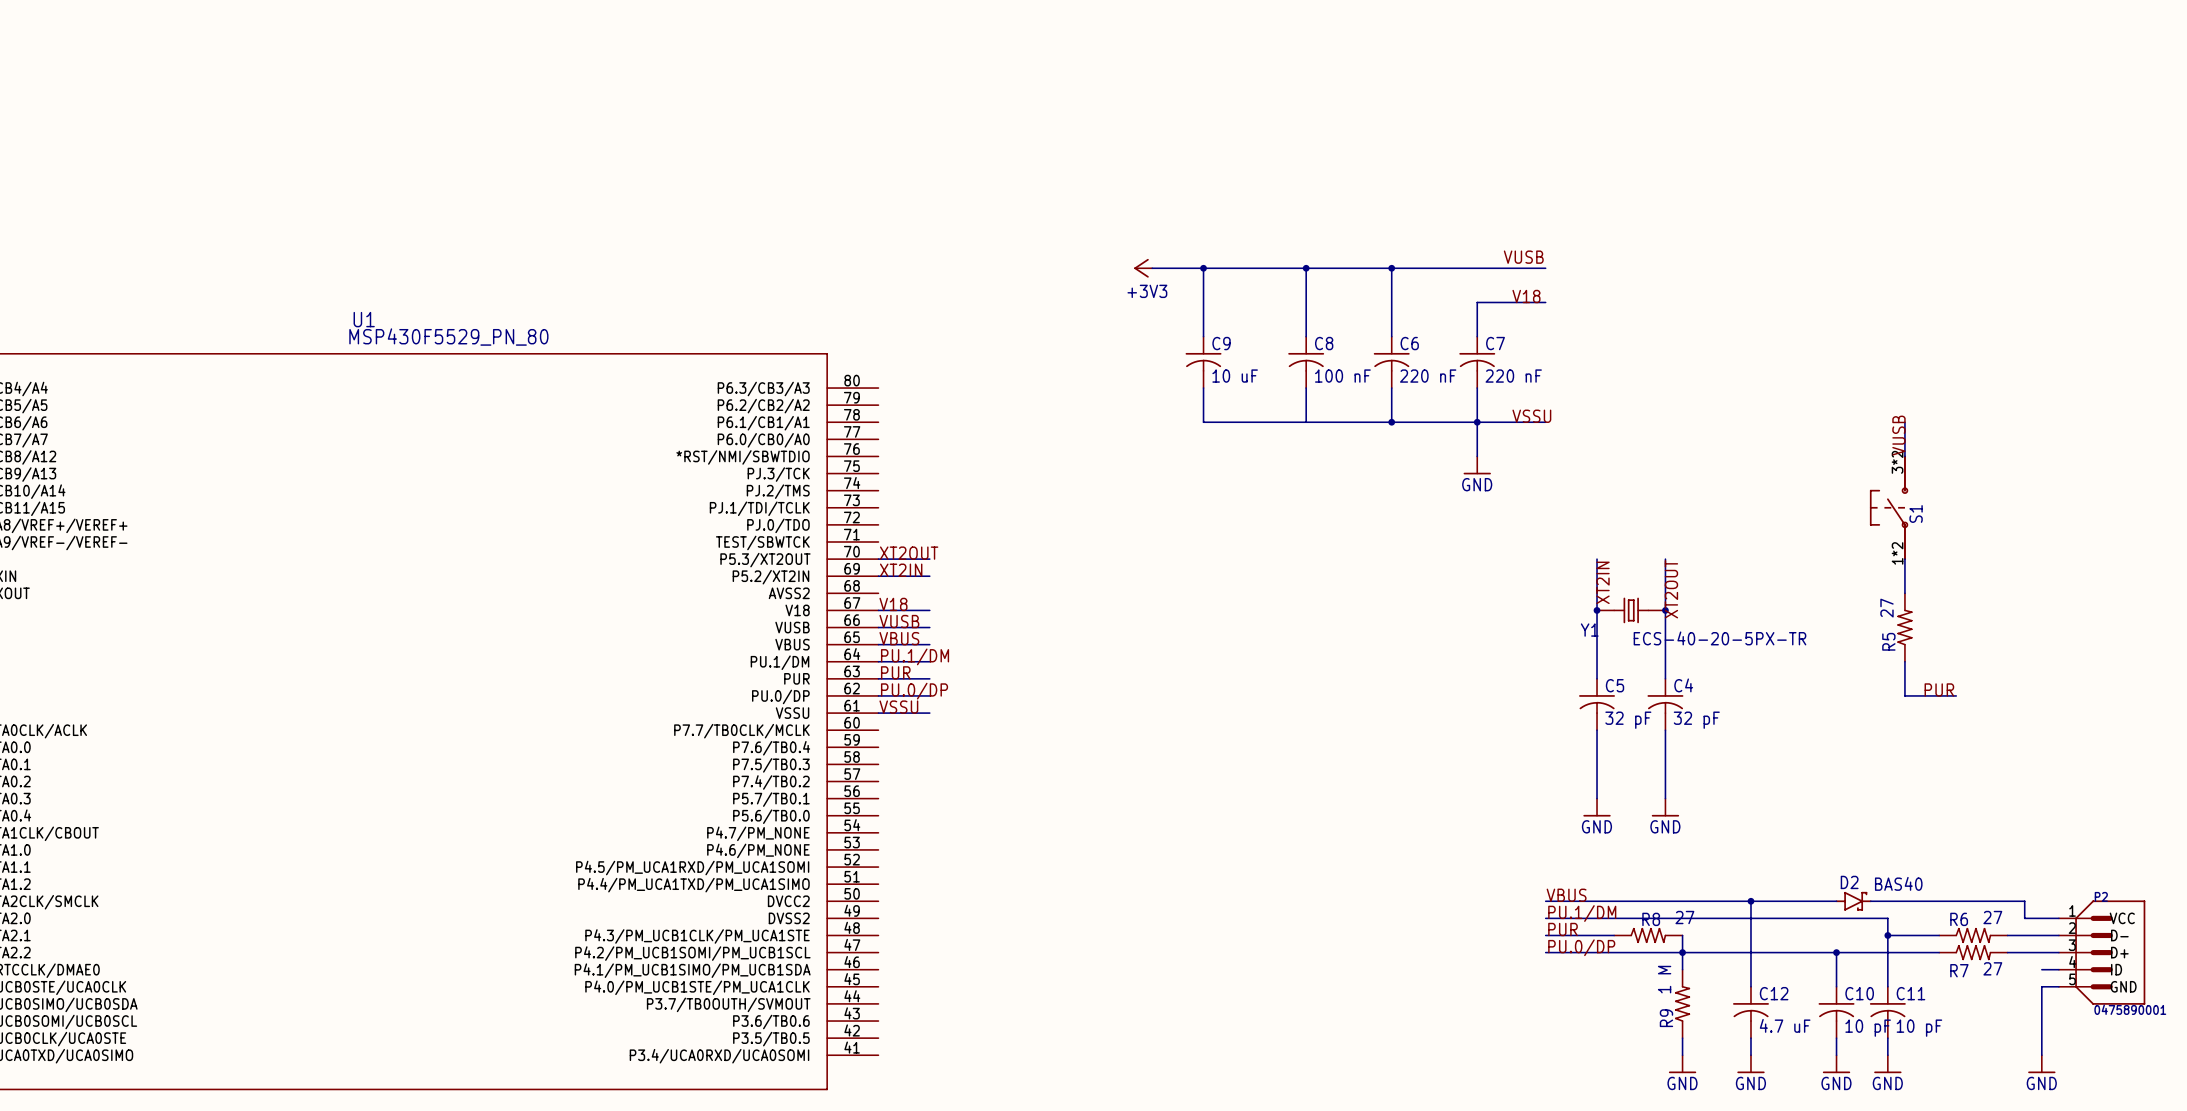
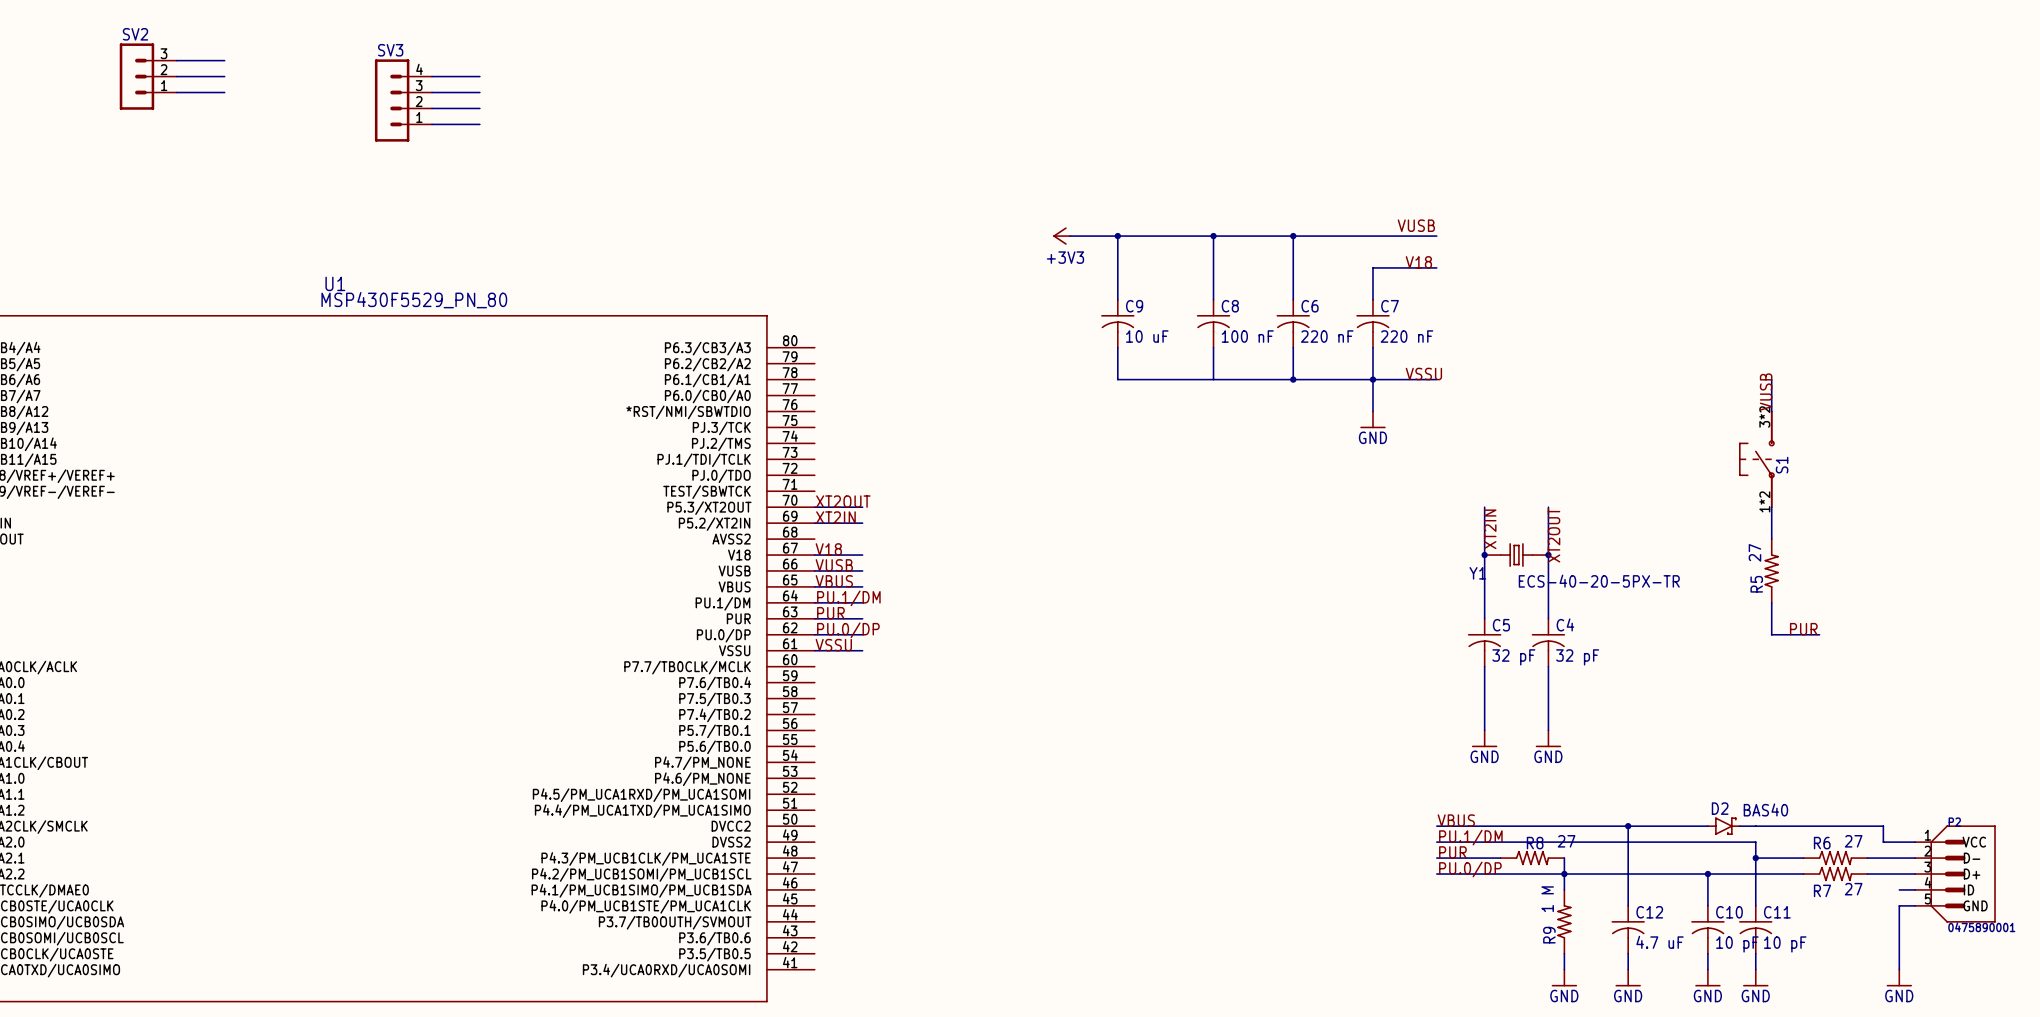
wire: none -> (176, 60) (224, 60)
SV2: none -> (148, 76)
wire: none -> (176, 76) (224, 76)
wire: none -> (432, 76) (479, 76)
wire: none -> (176, 92) (224, 92)
wire: none -> (432, 92) (479, 92)
SV3: none -> (403, 100)
wire: none -> (432, 108) (479, 108)
wire: none -> (432, 124) (479, 124)

